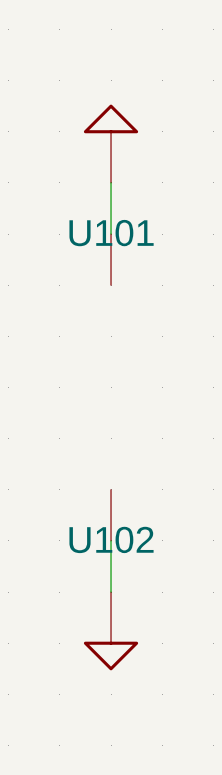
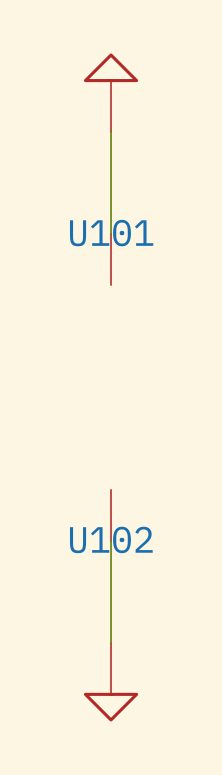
power symbol position: (111, 143) -> (111, 92)
power symbol position: (111, 631) -> (111, 682)

